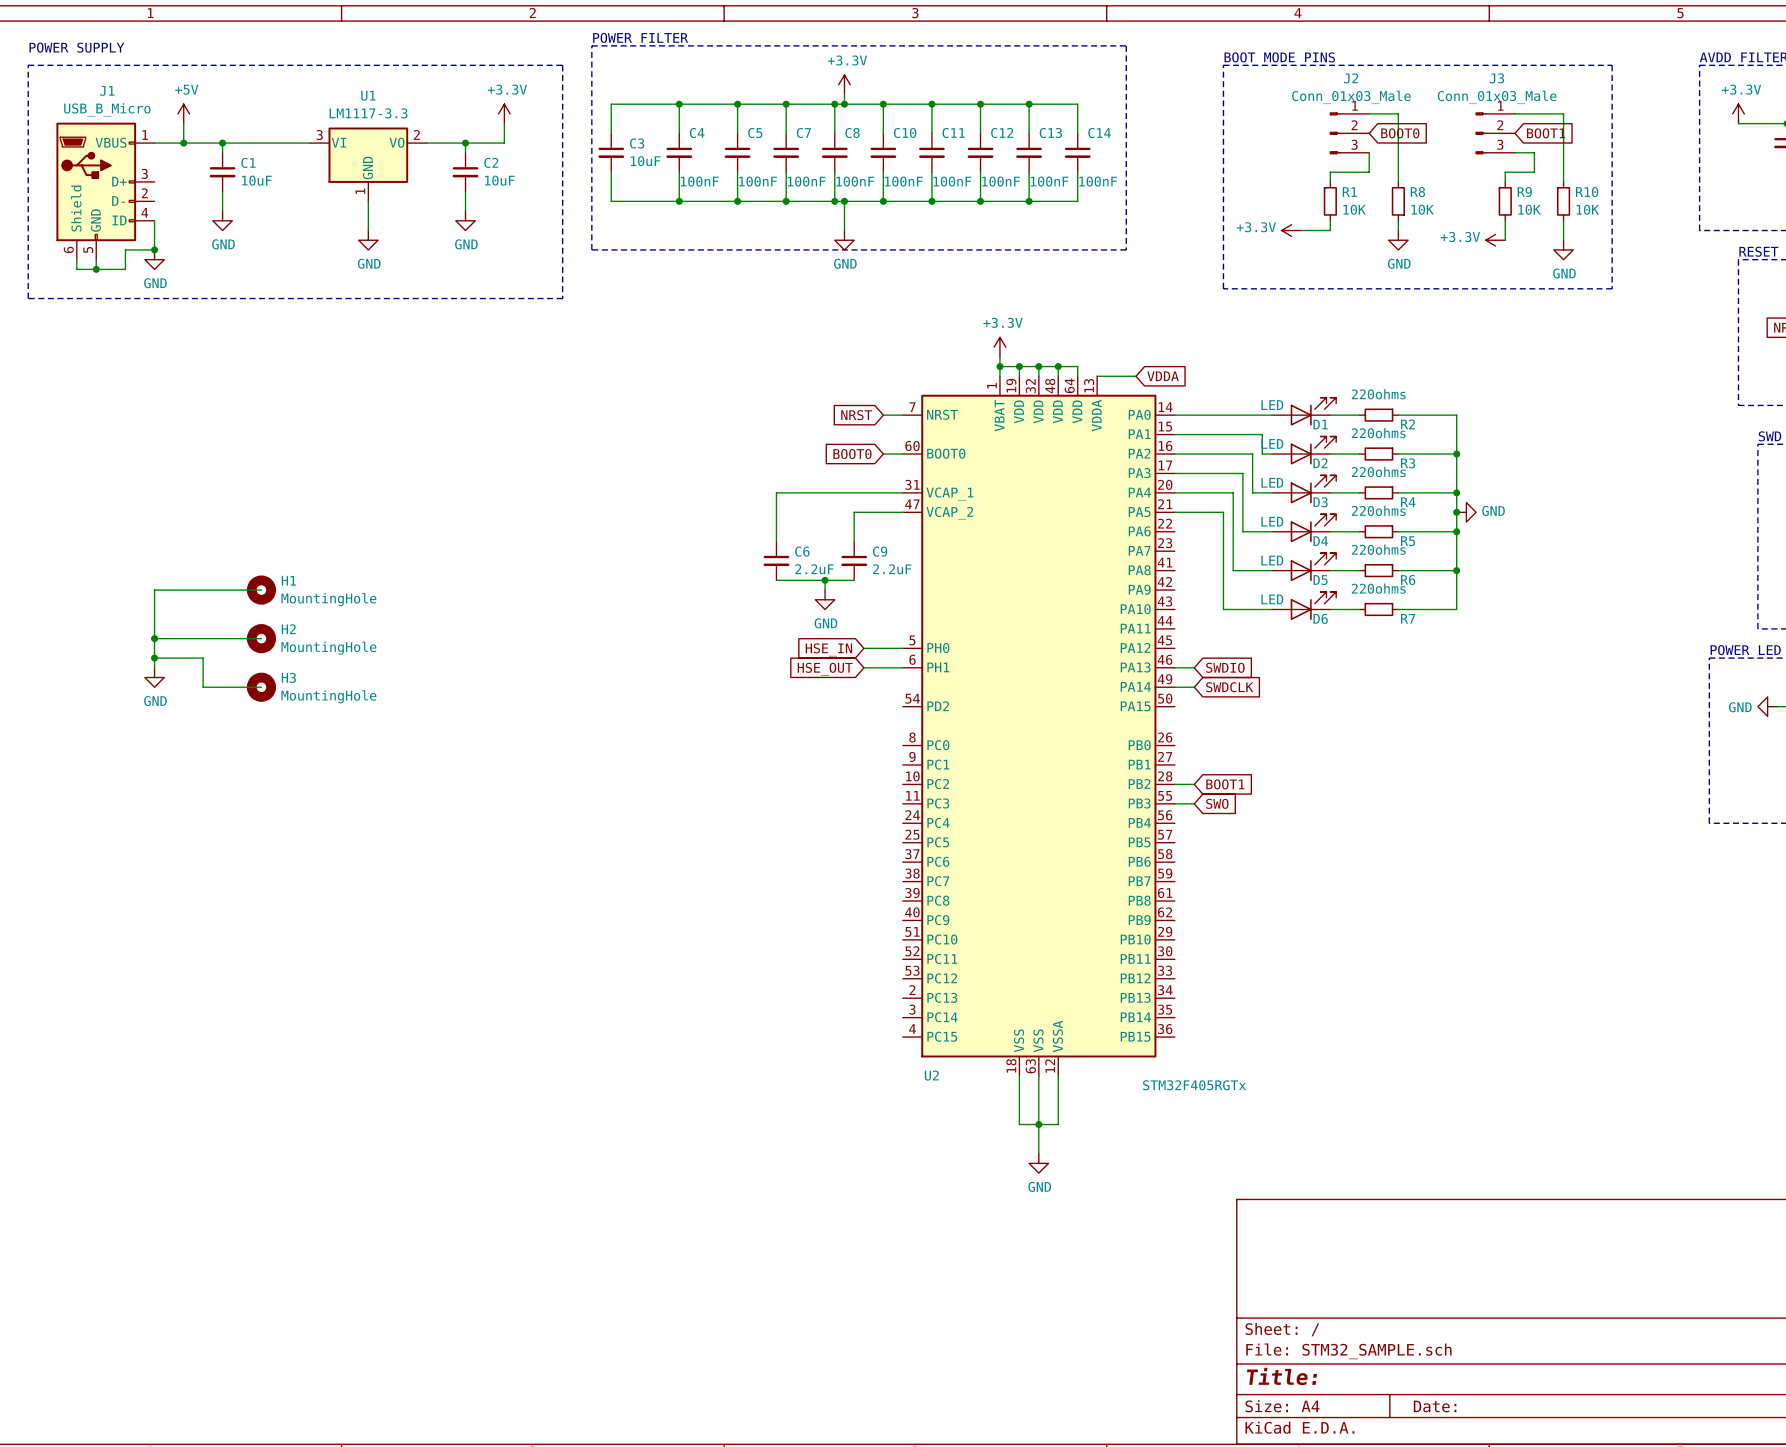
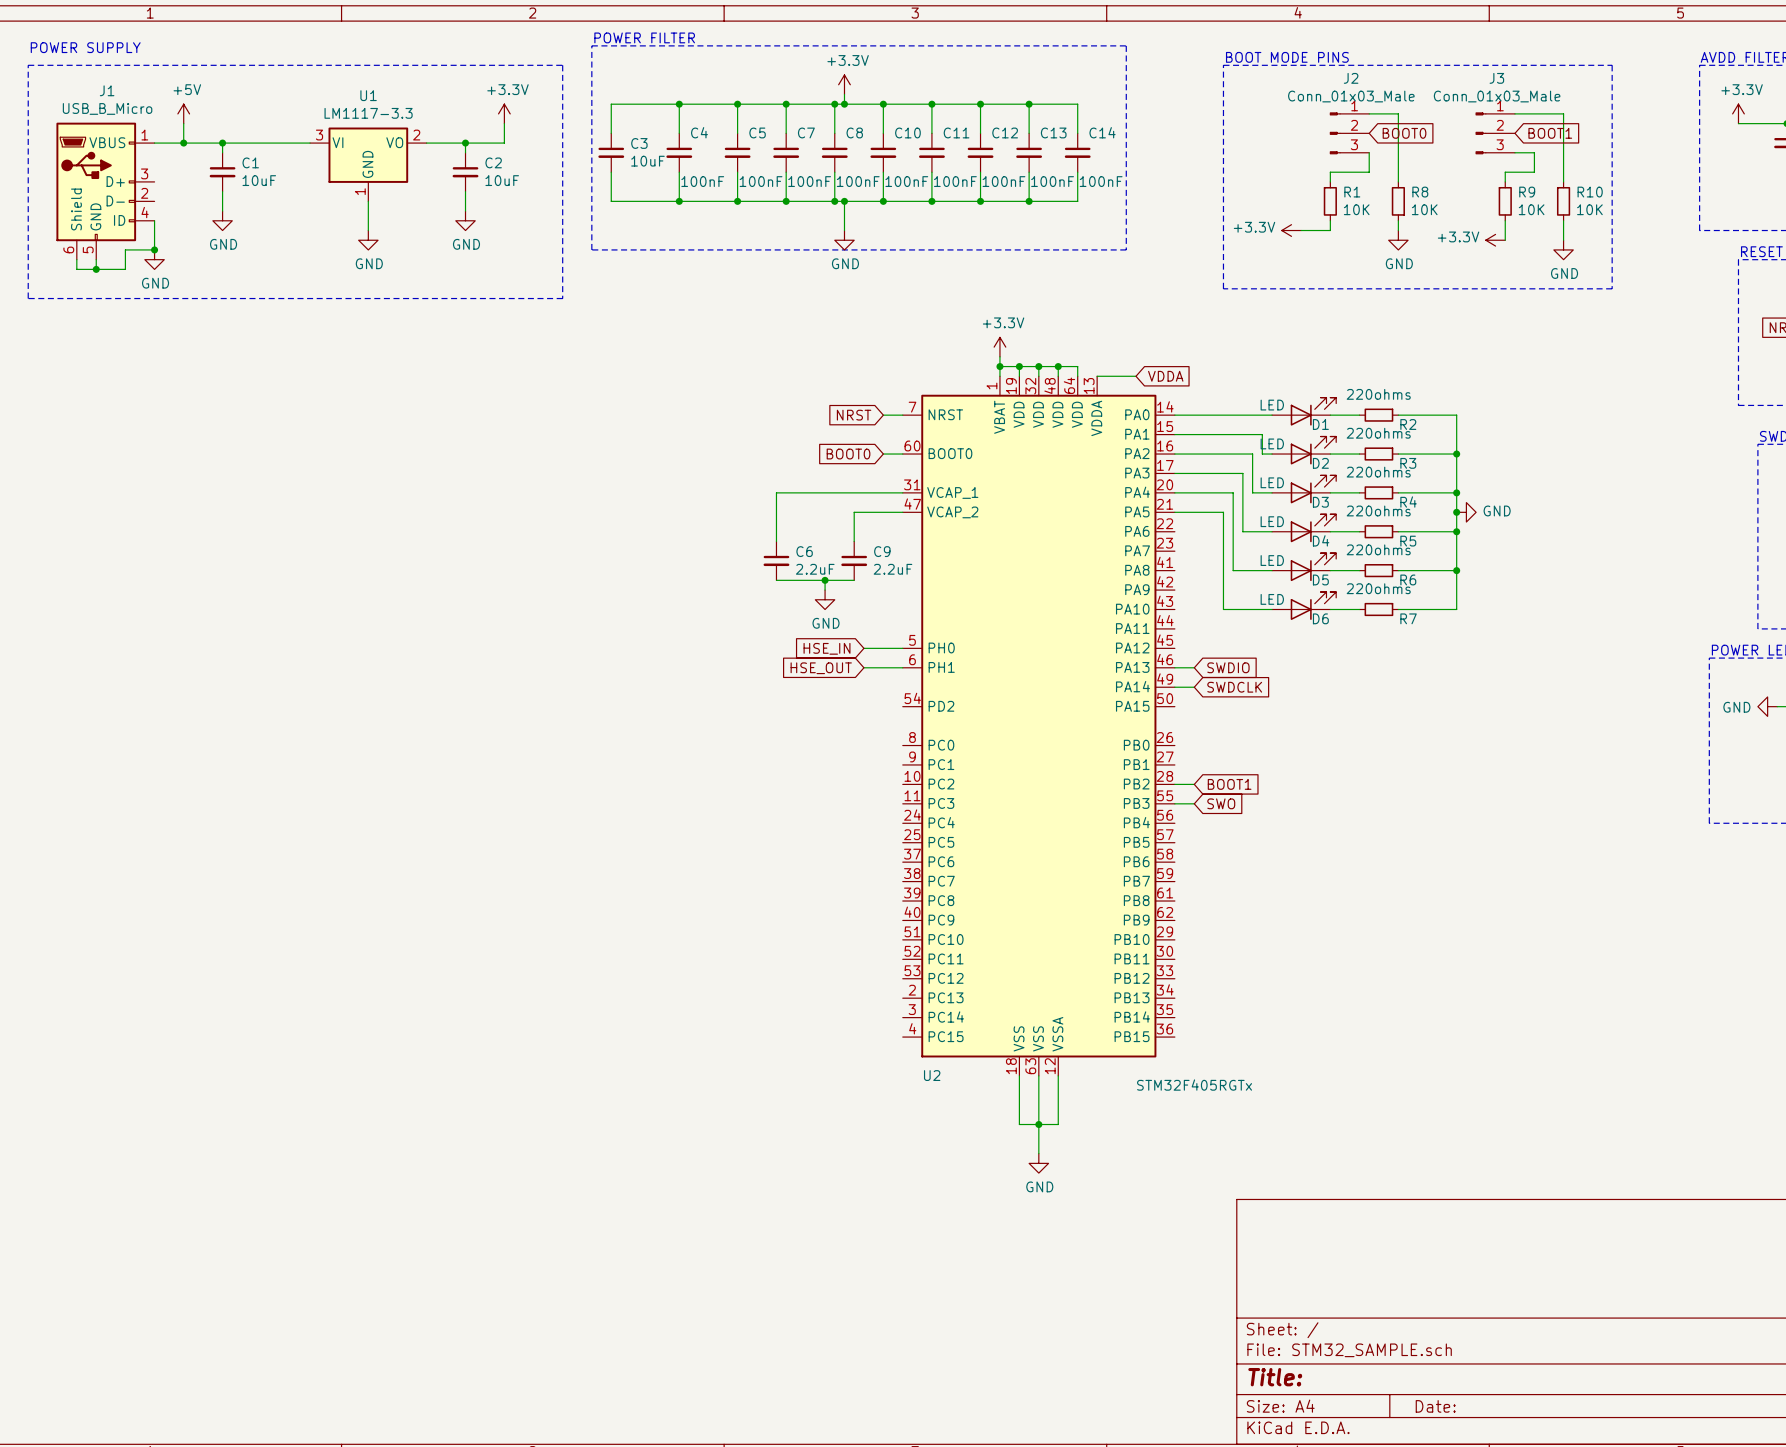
wire: (261, 590) (154, 590) (154, 667) -> none
H1: MountingHole (261, 590) -> none
wire: (154, 638) (261, 638) -> none
junction: (154, 638) -> none
H2: MountingHole (261, 638) -> none
wire: (154, 658) (203, 658) (203, 687) (261, 687) -> none
junction: (154, 658) -> none
power symbol: GND (154, 677) -> none
H3: MountingHole (261, 687) -> none

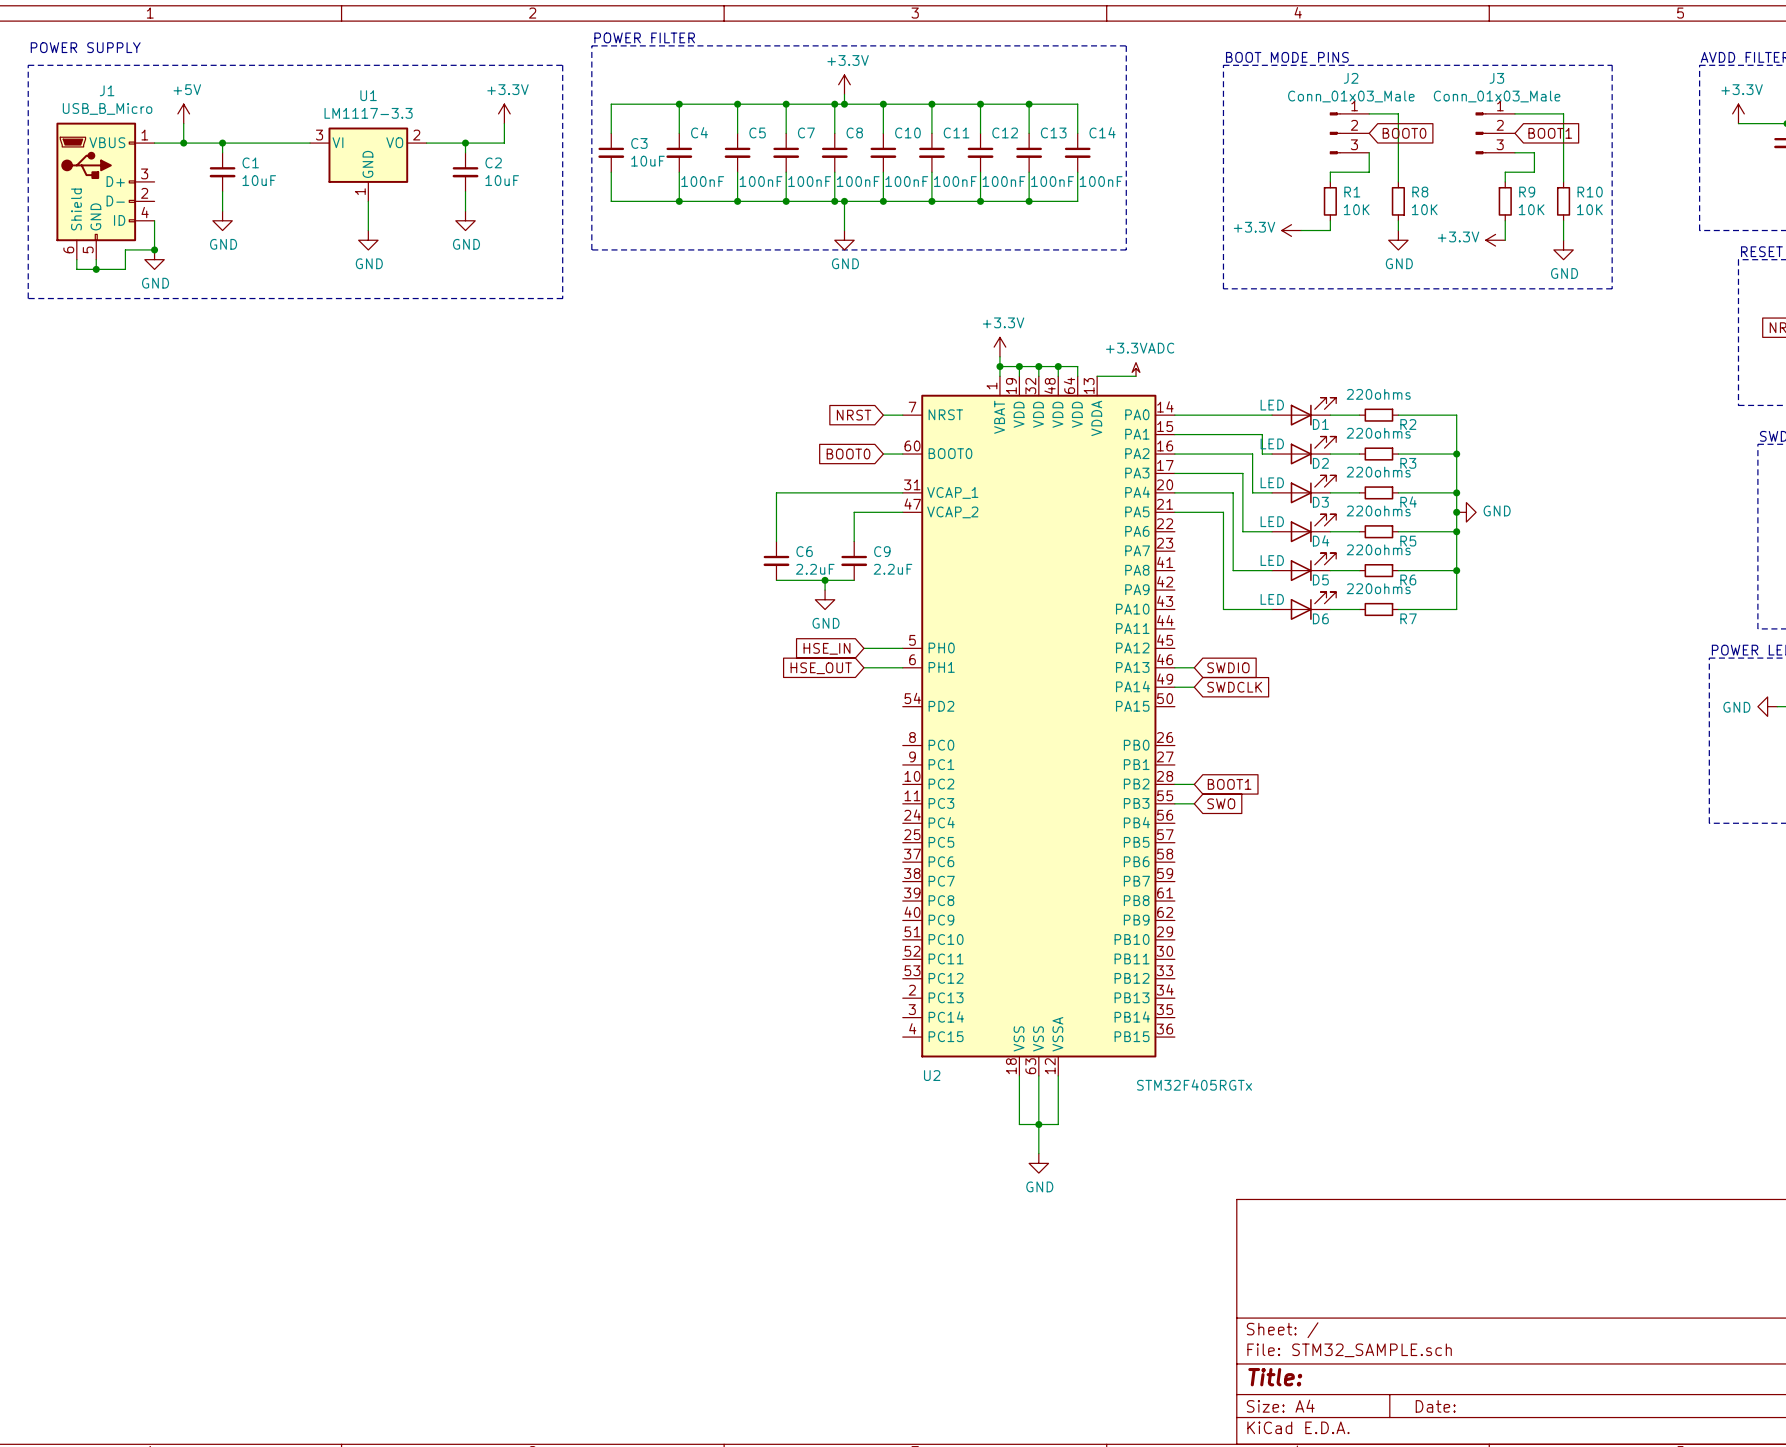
power symbol: none -> +3.3VADC (1136, 369)
global label: VDDA (1165, 376) -> none

